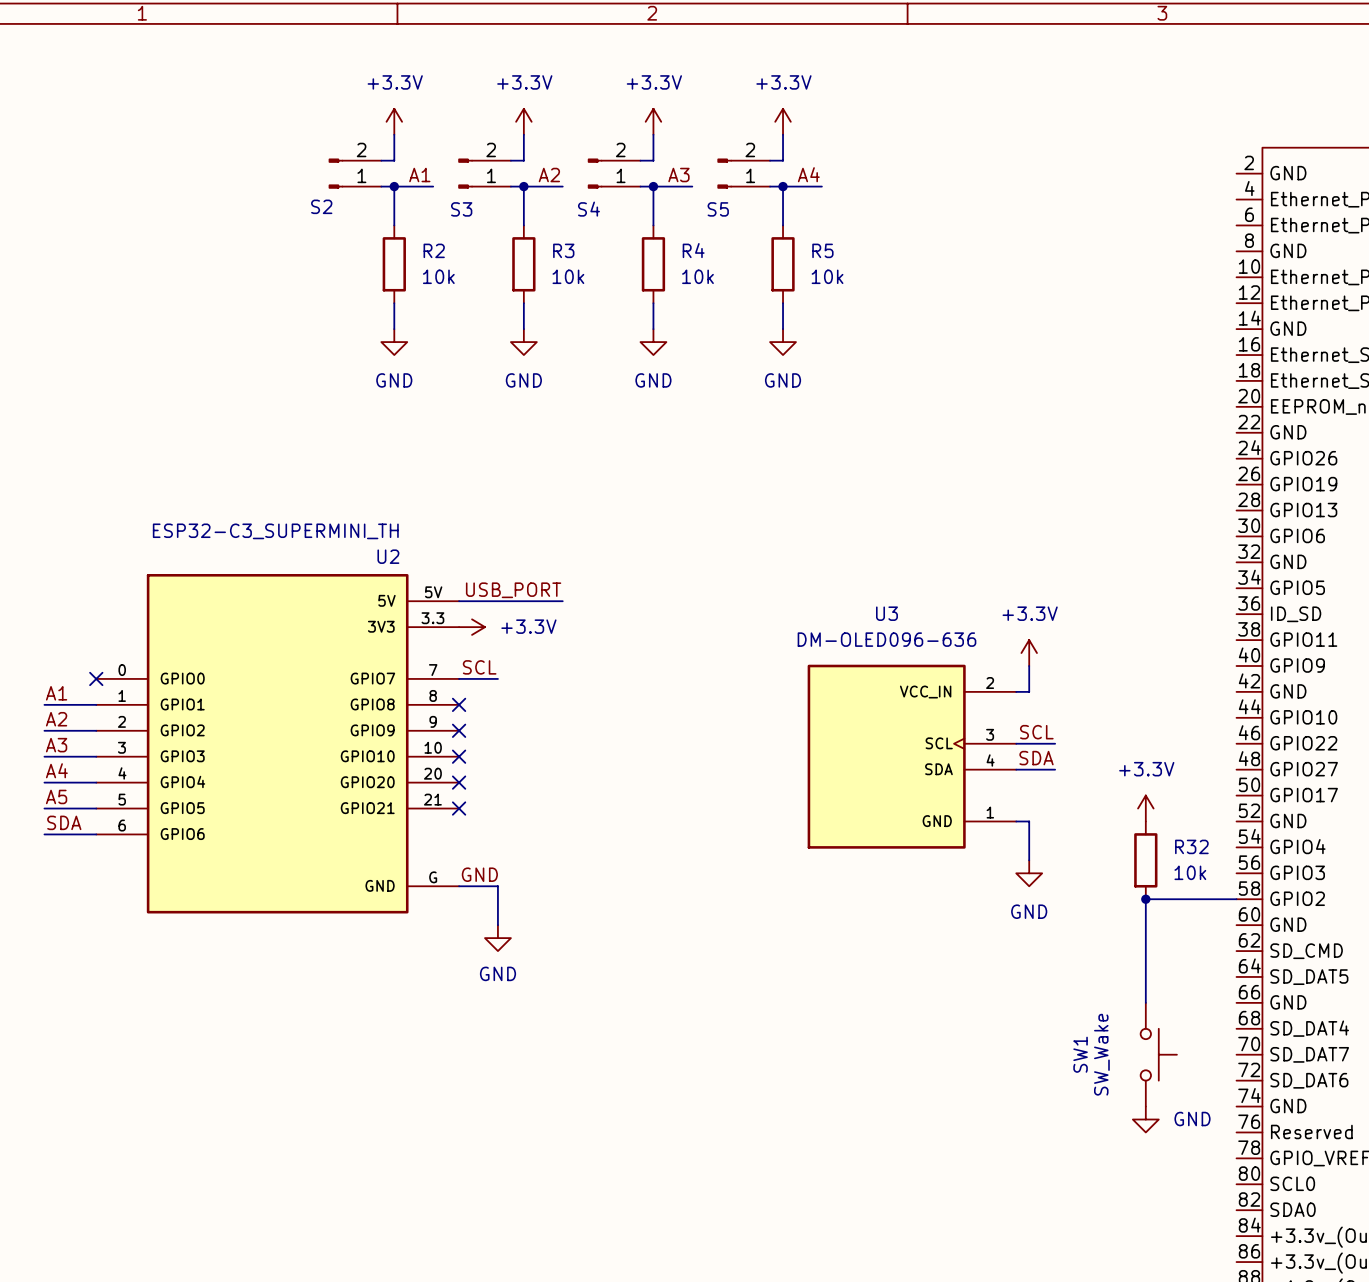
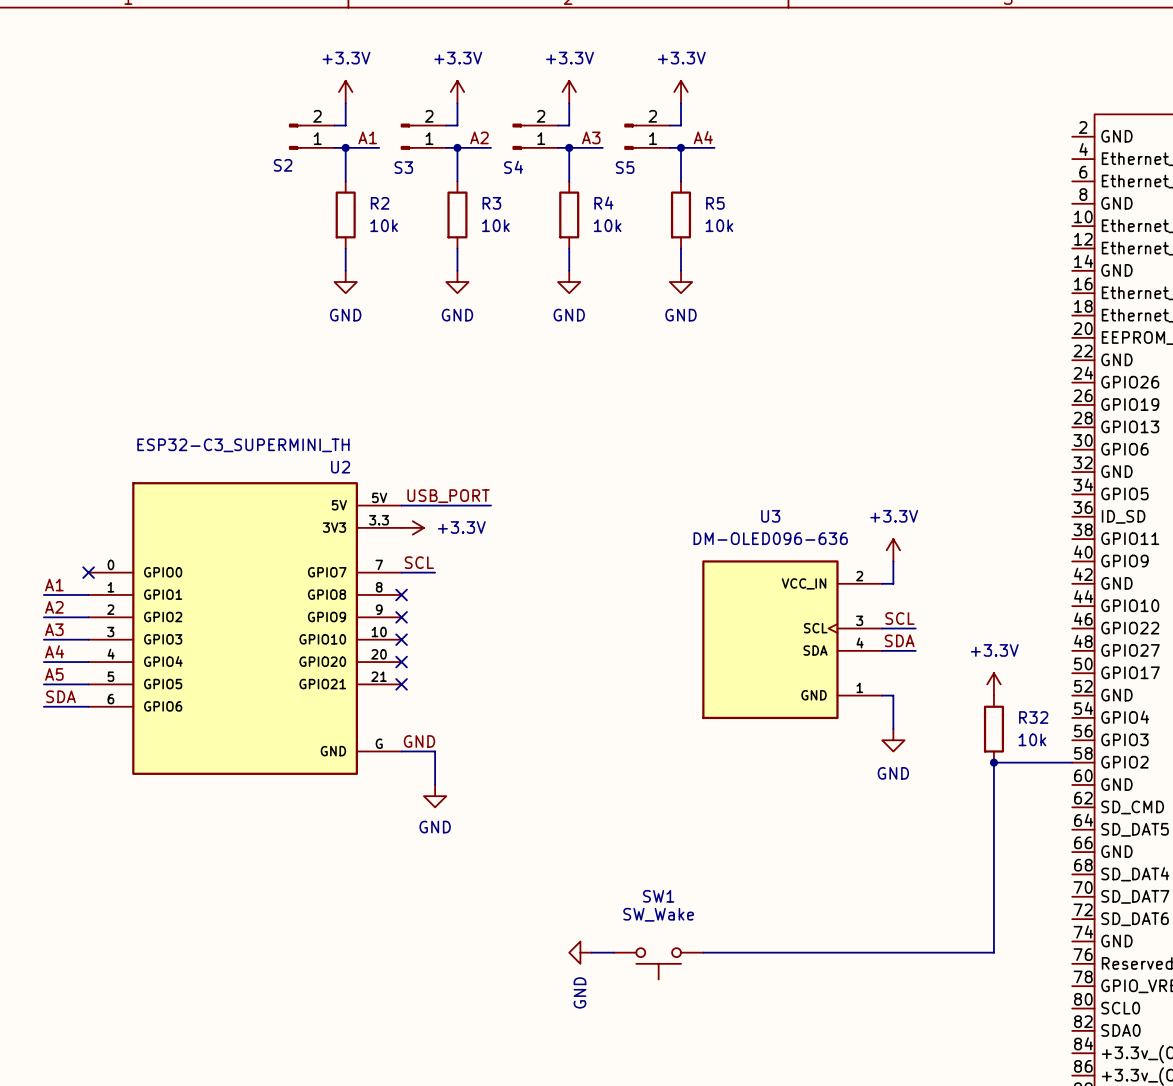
wire: none -> (993, 852) (993, 952) (703, 952)
SW1 rotation: 0° (1158, 1054) -> 90° clockwise (658, 963)
SW1 position: (1158, 1054) -> (658, 963)
power symbol: none -> GND (580, 952)
wire: none -> (591, 952) (613, 952)
power symbol: GND (1145, 1119) -> none

